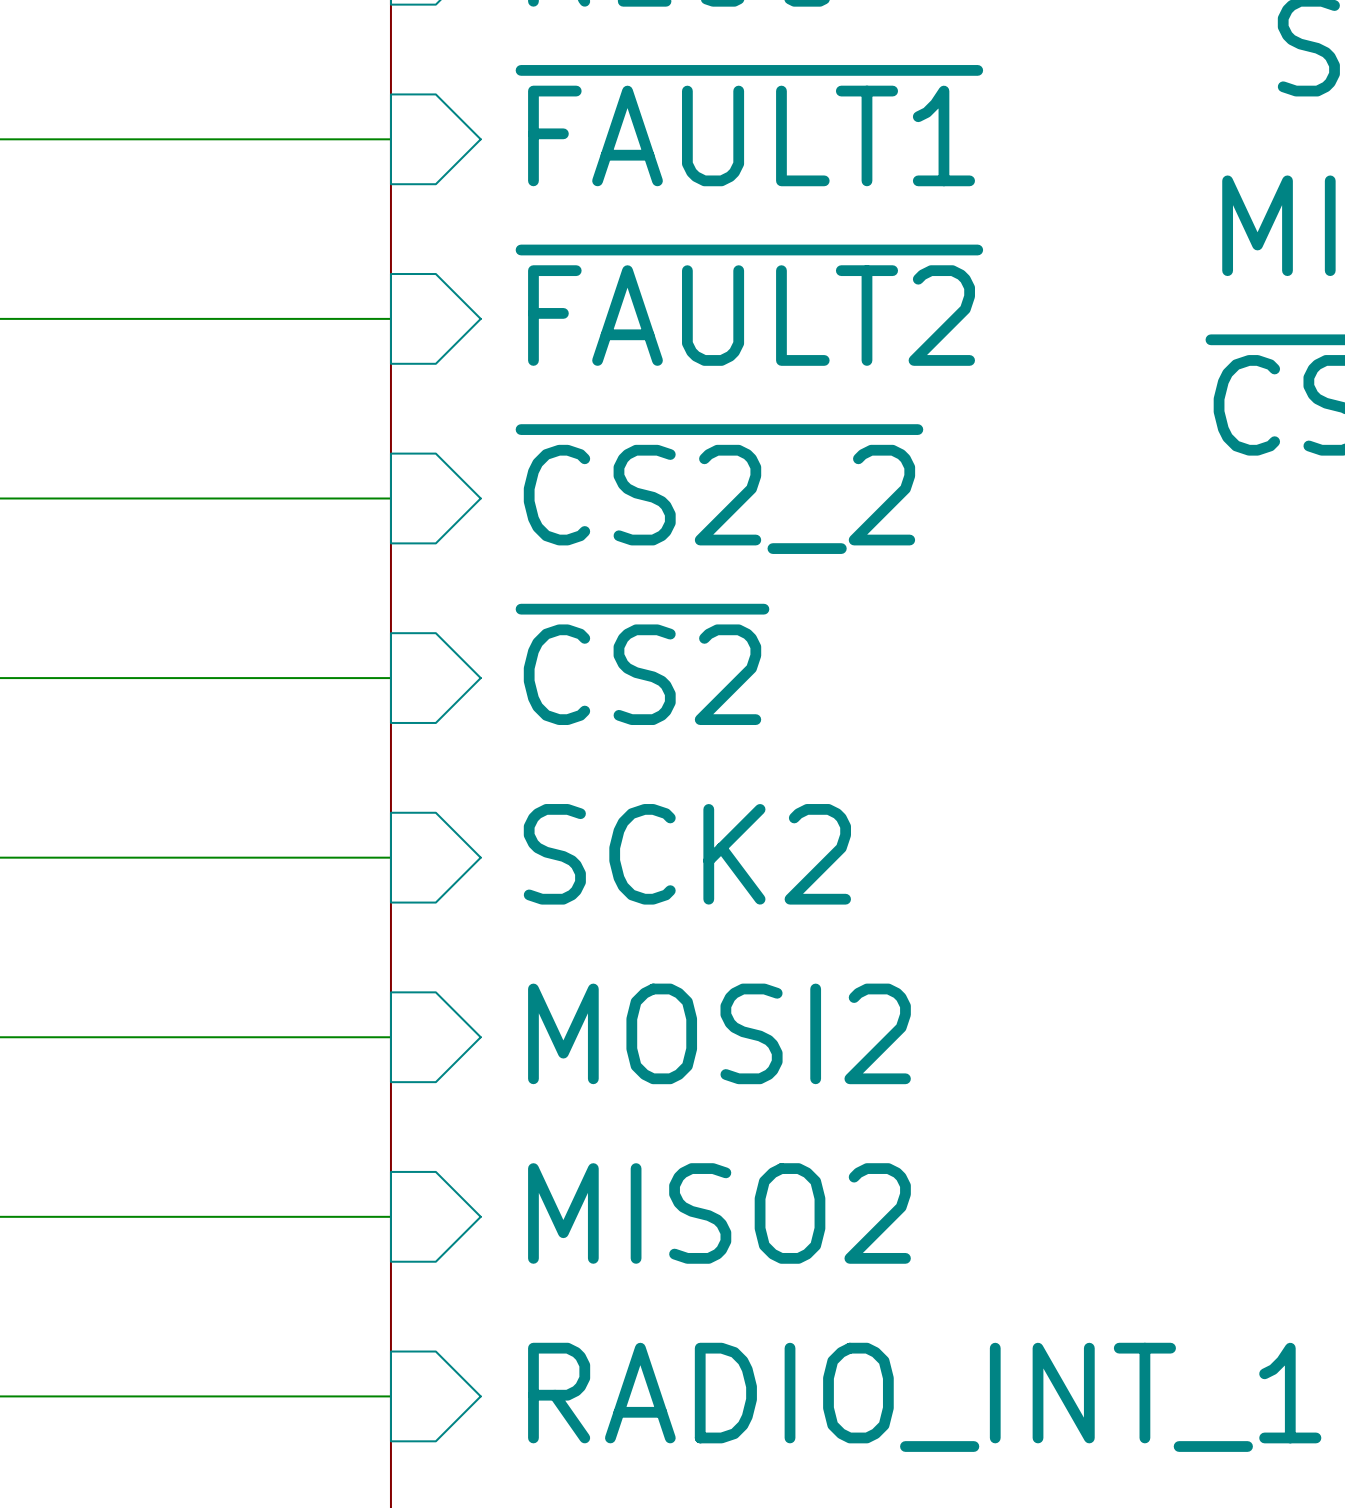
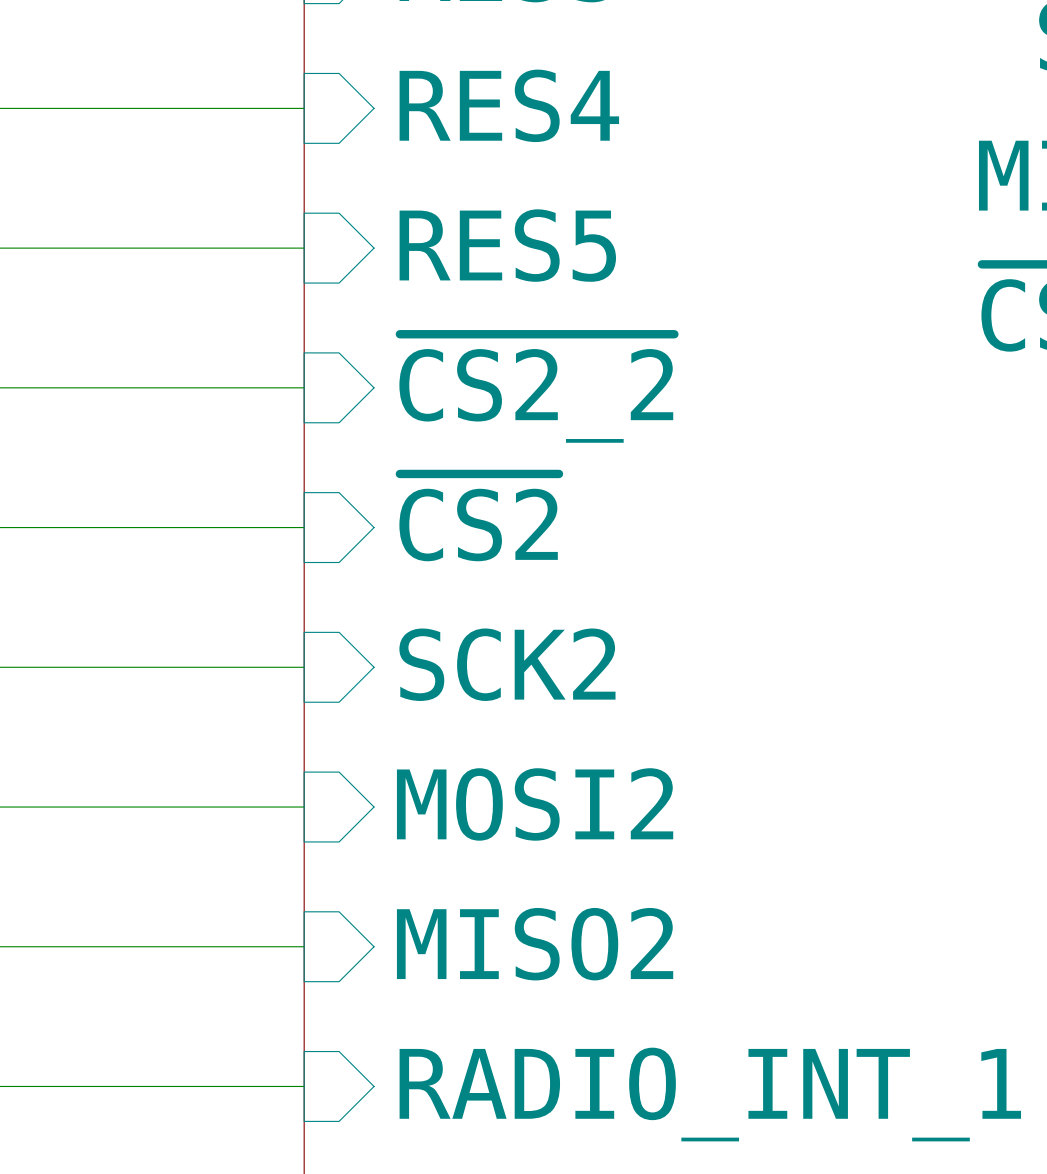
sheet pin: ~{FAULT1} (749, 125) -> RES4 (509, 105)
sheet pin: ~{FAULT2} (749, 305) -> RES5 (507, 245)

